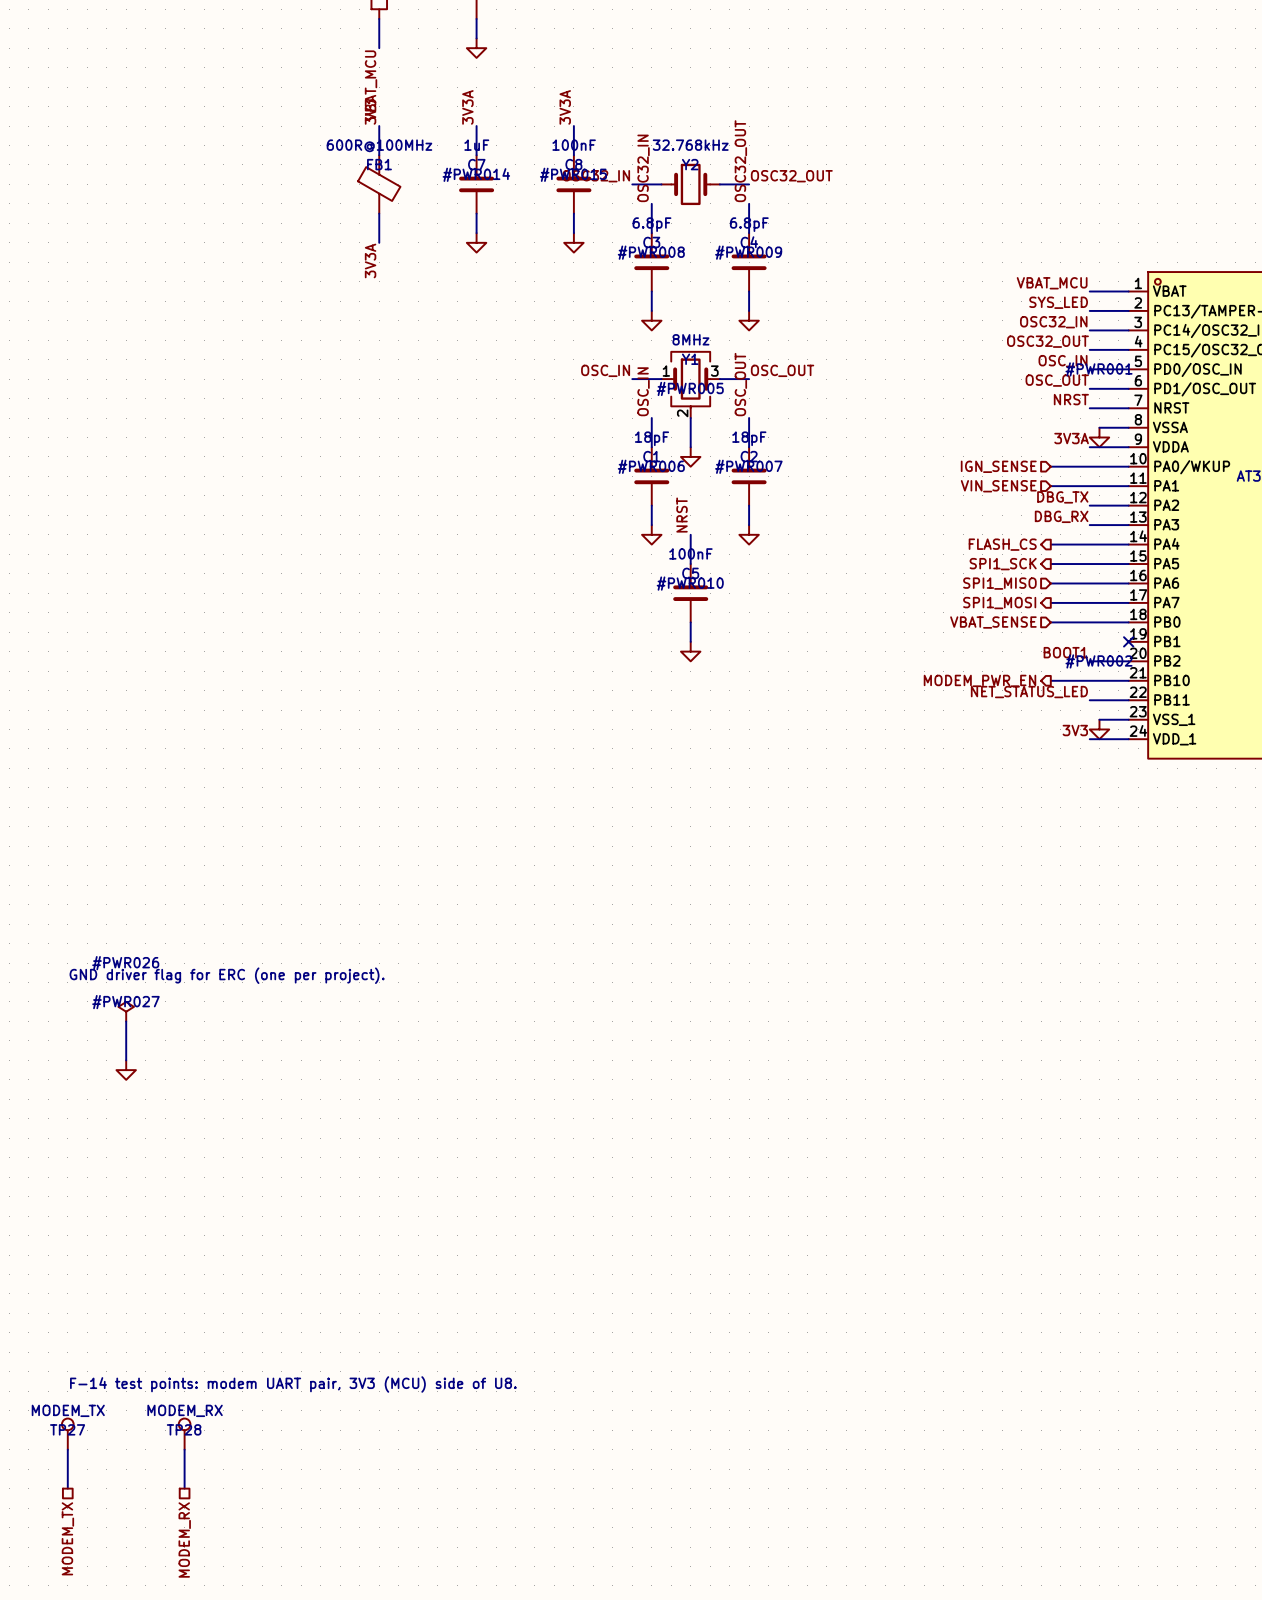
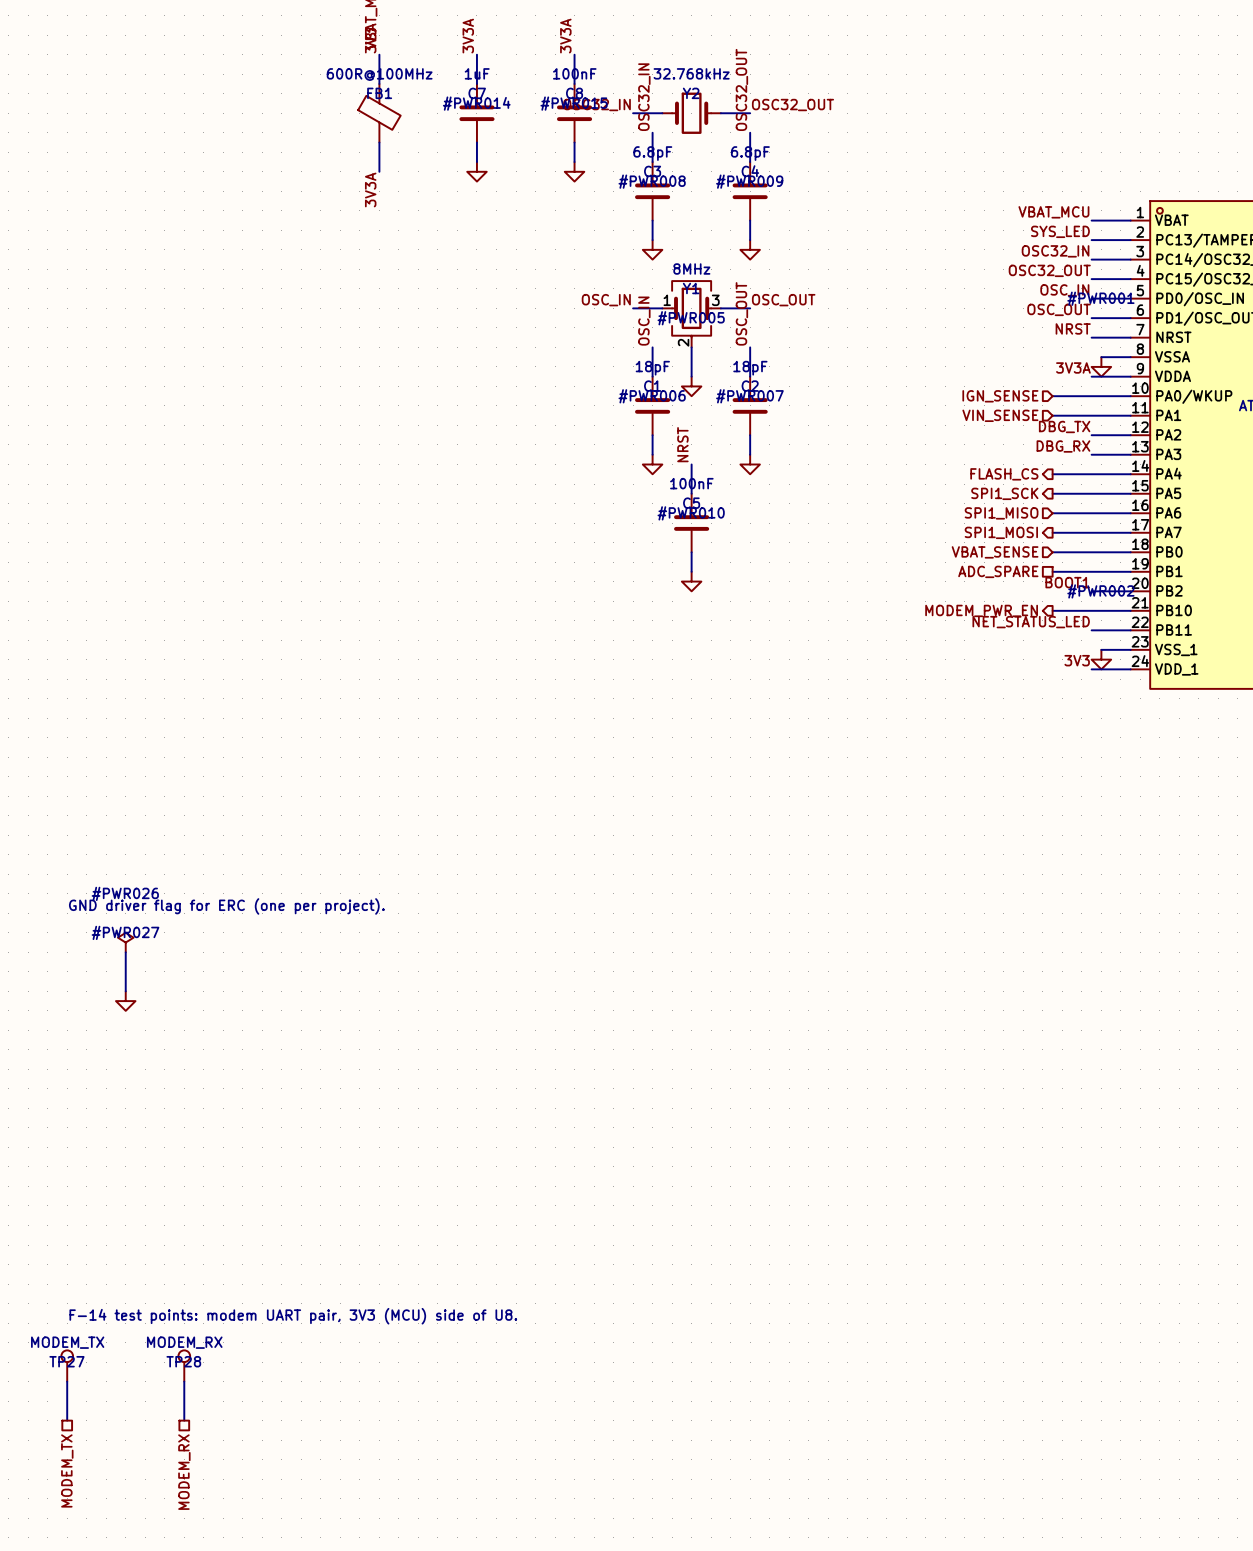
hierarchical label: none -> ADC_SPARE (998, 571)
wire: none -> (1052, 571) (1130, 571)
no-connect mark: (1128, 641) -> none

